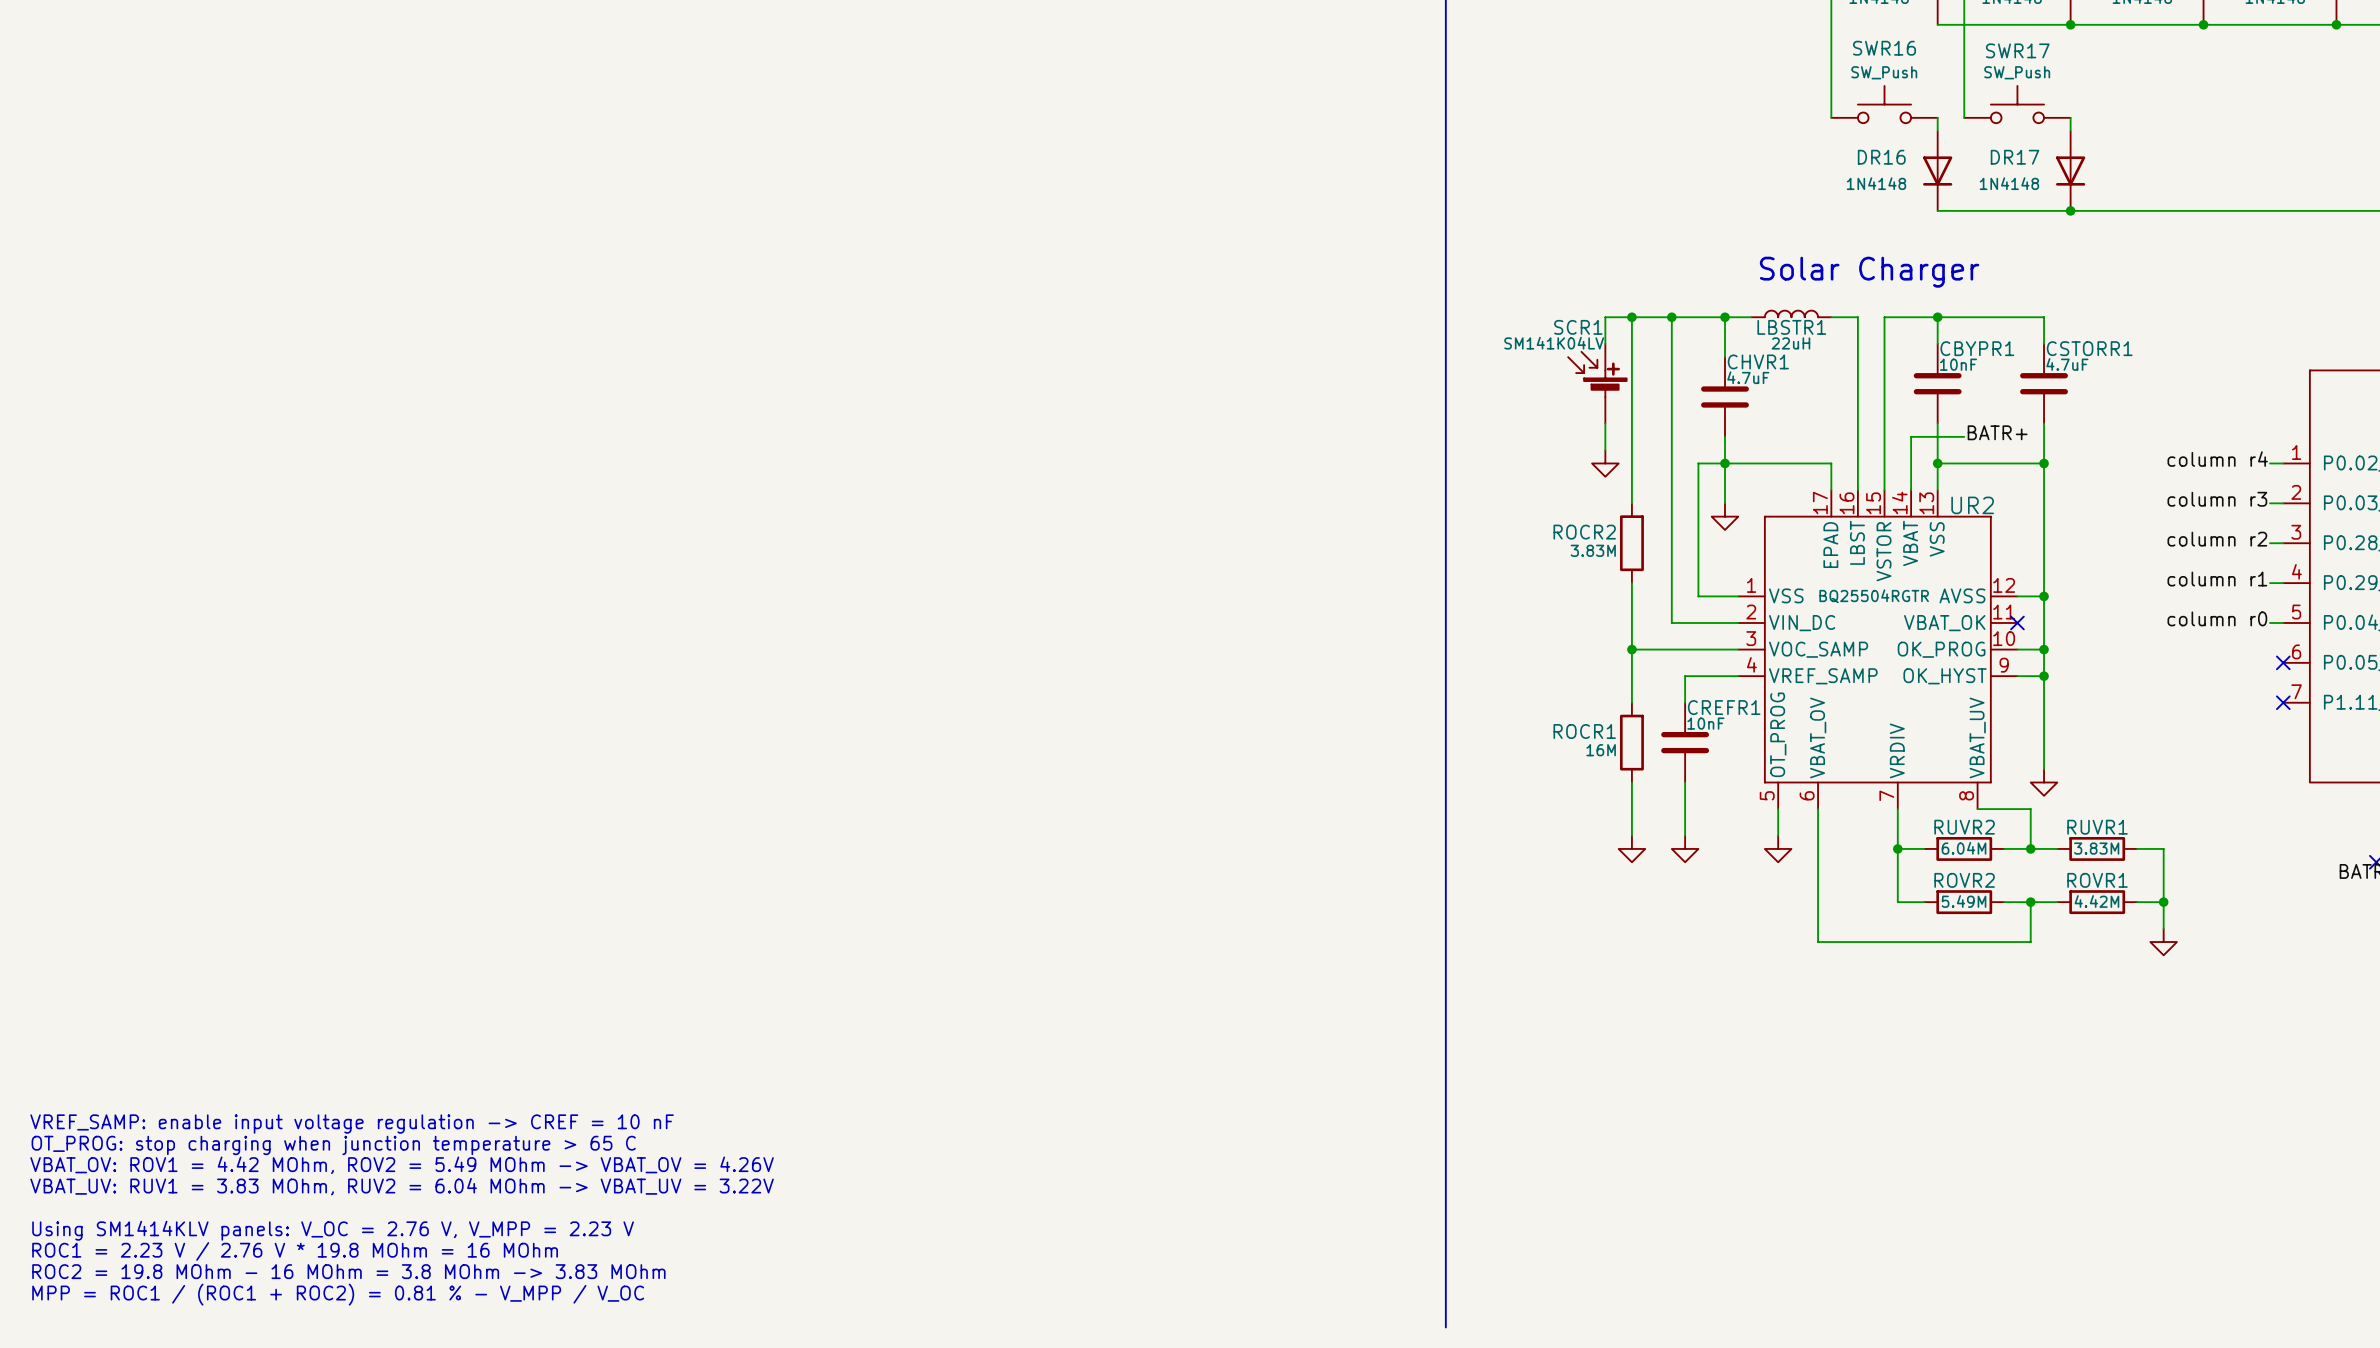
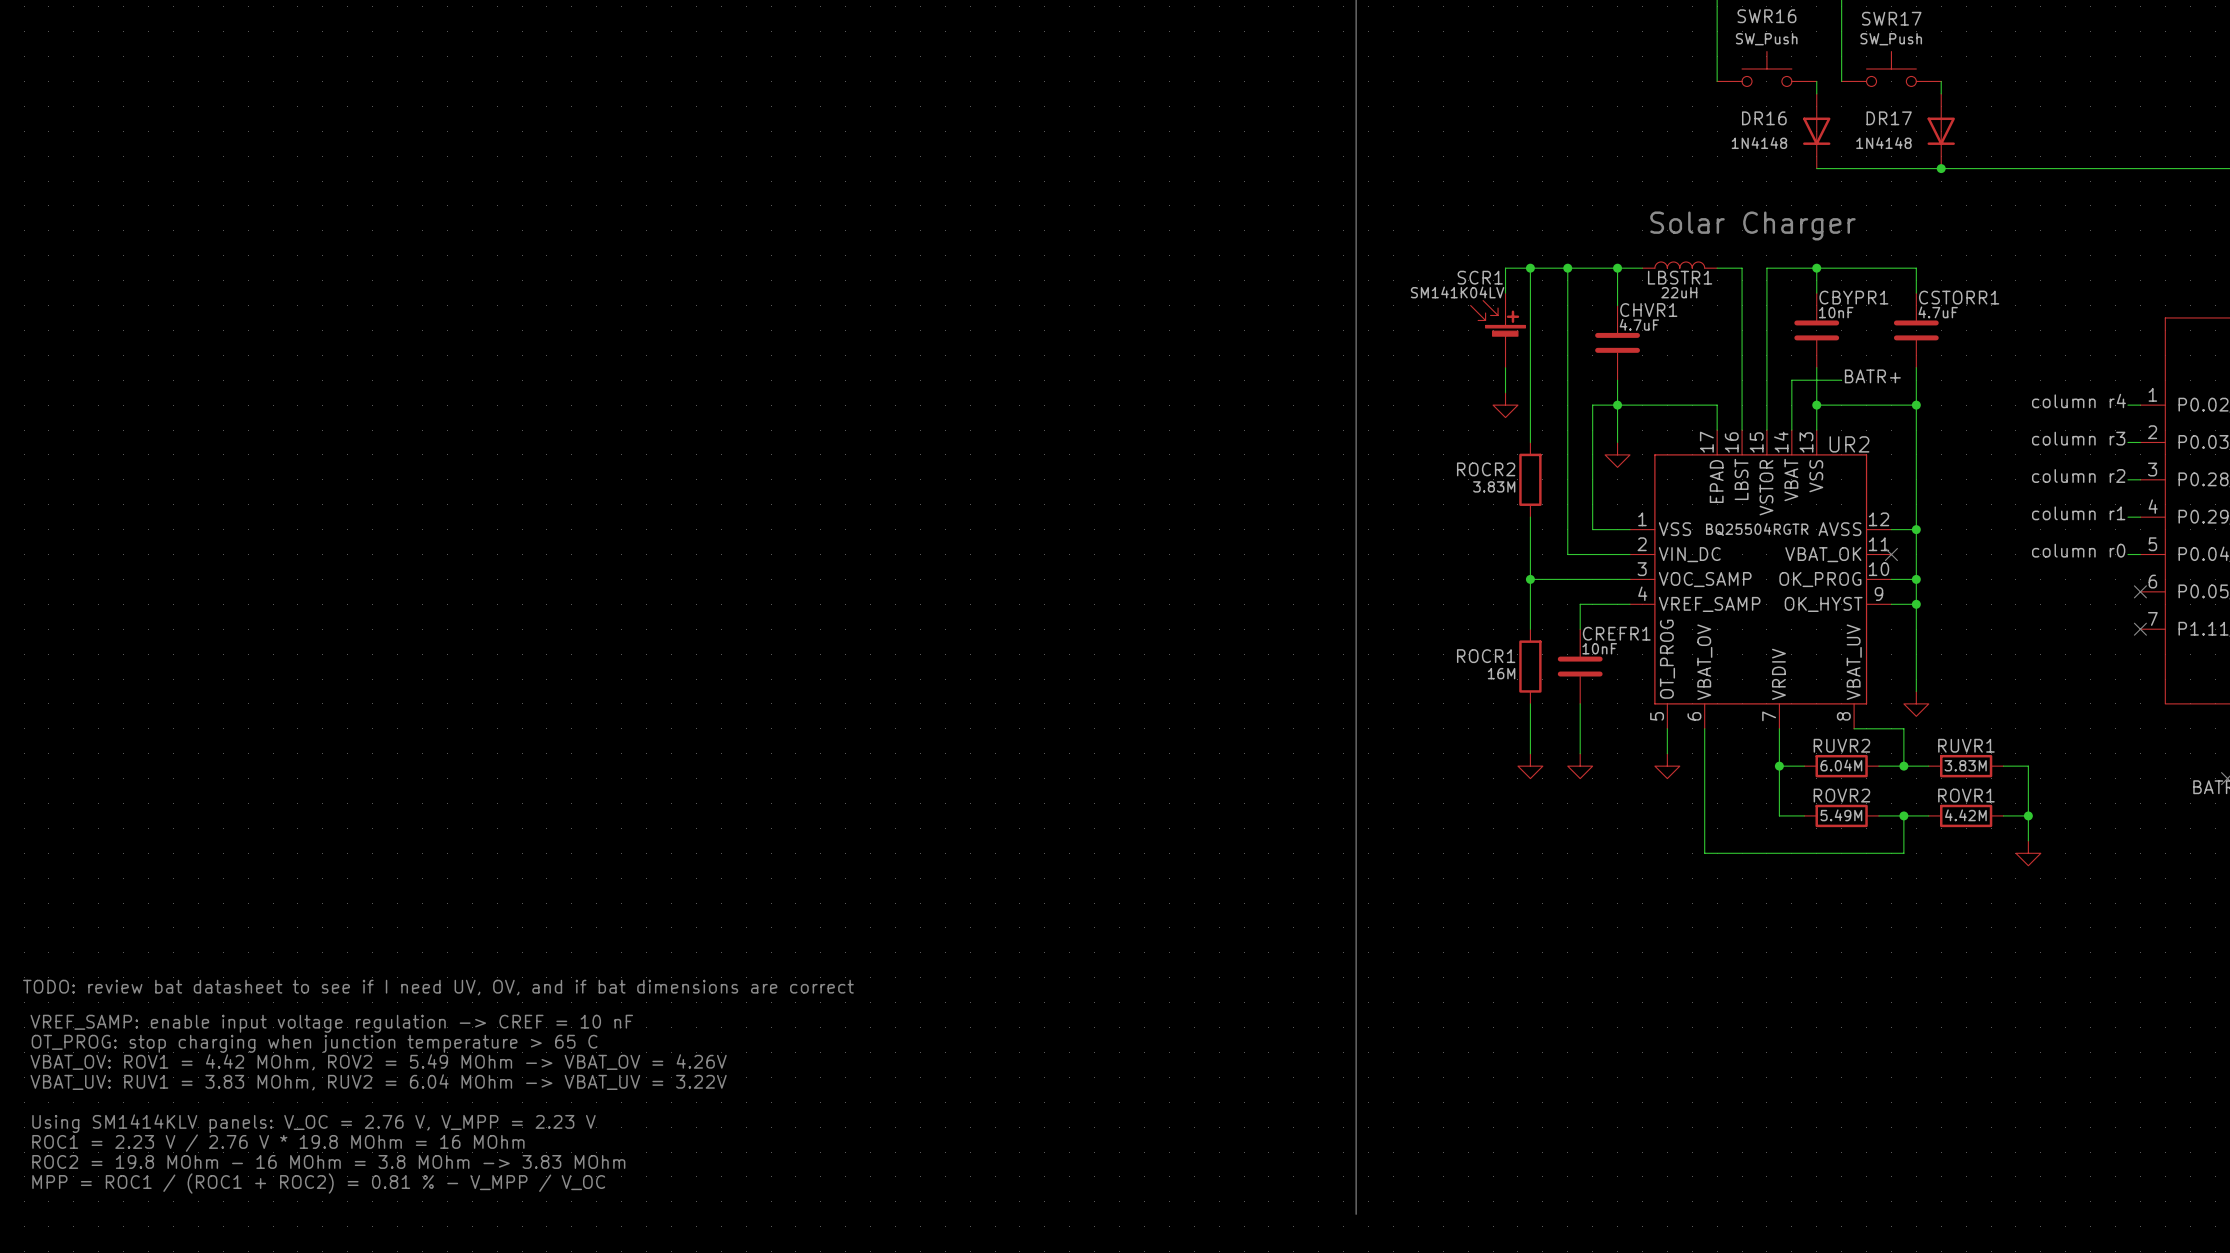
text: none -> TODO: review bat datasheet to see if I need UV, OV, and if bat dimensions are correct (438, 987)

